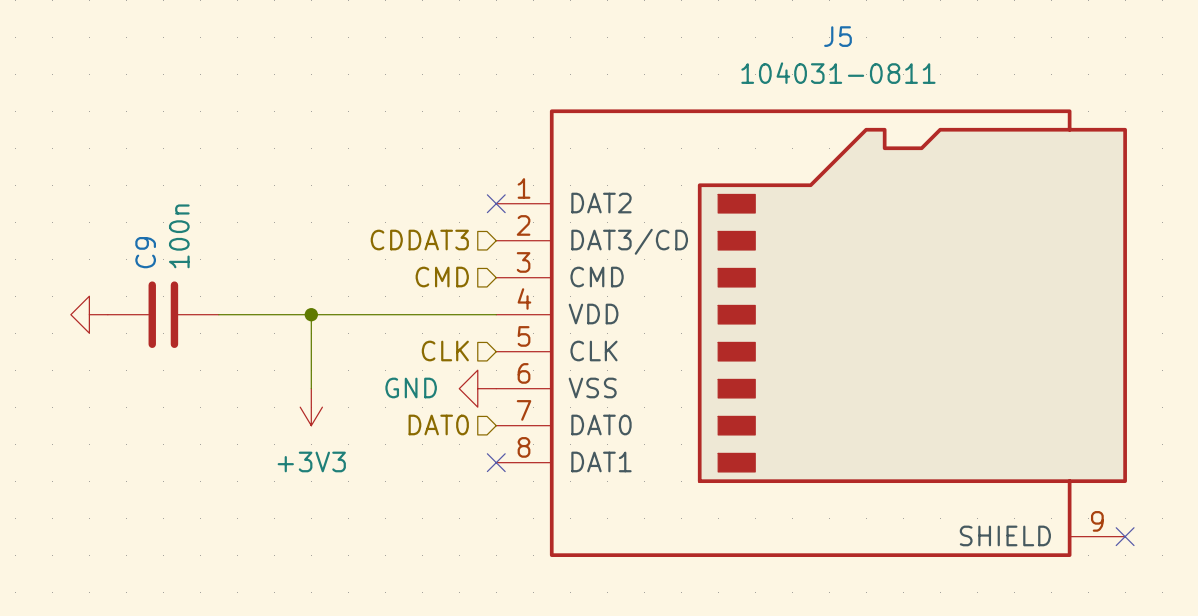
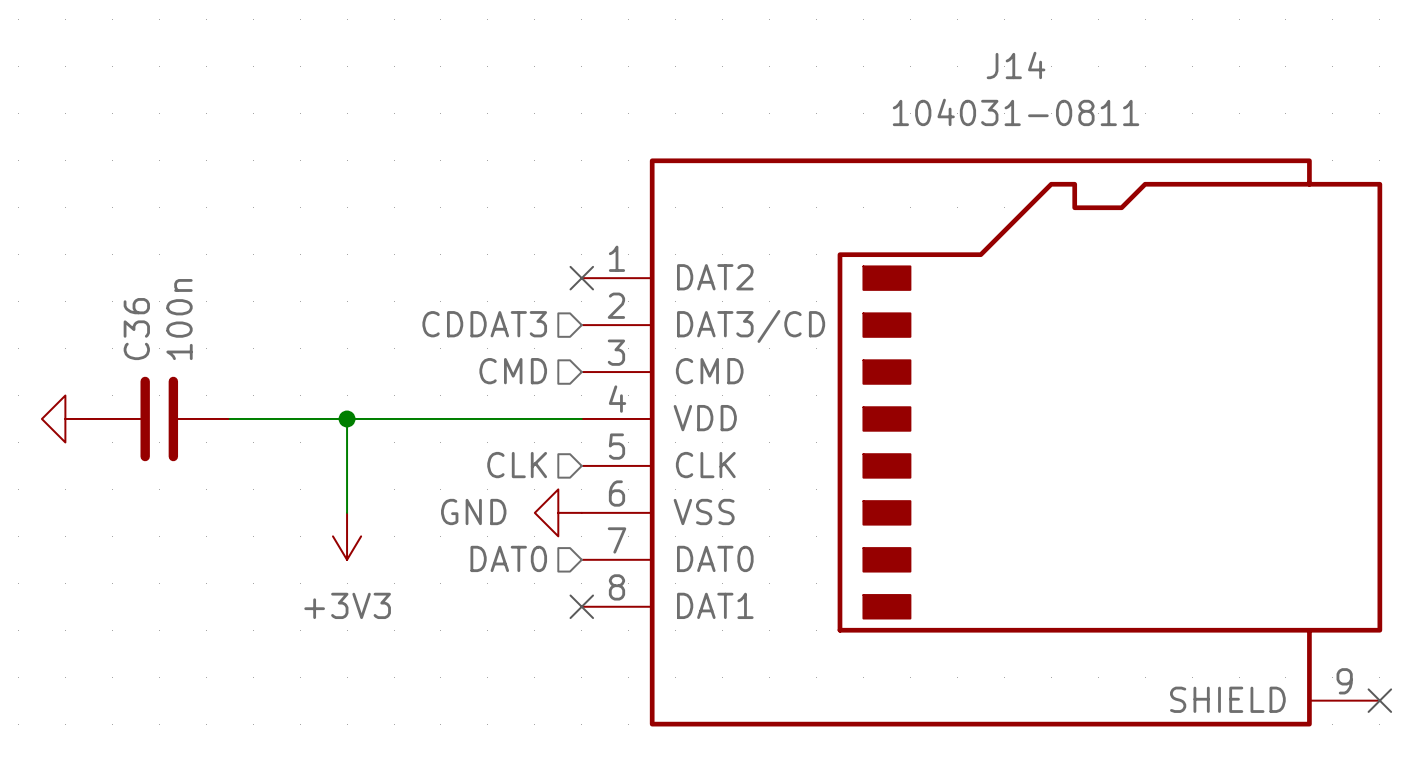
J5 name: J5 (837, 36) -> J14 (1016, 65)
C9 name: C9 (145, 252) -> C36 (136, 329)

